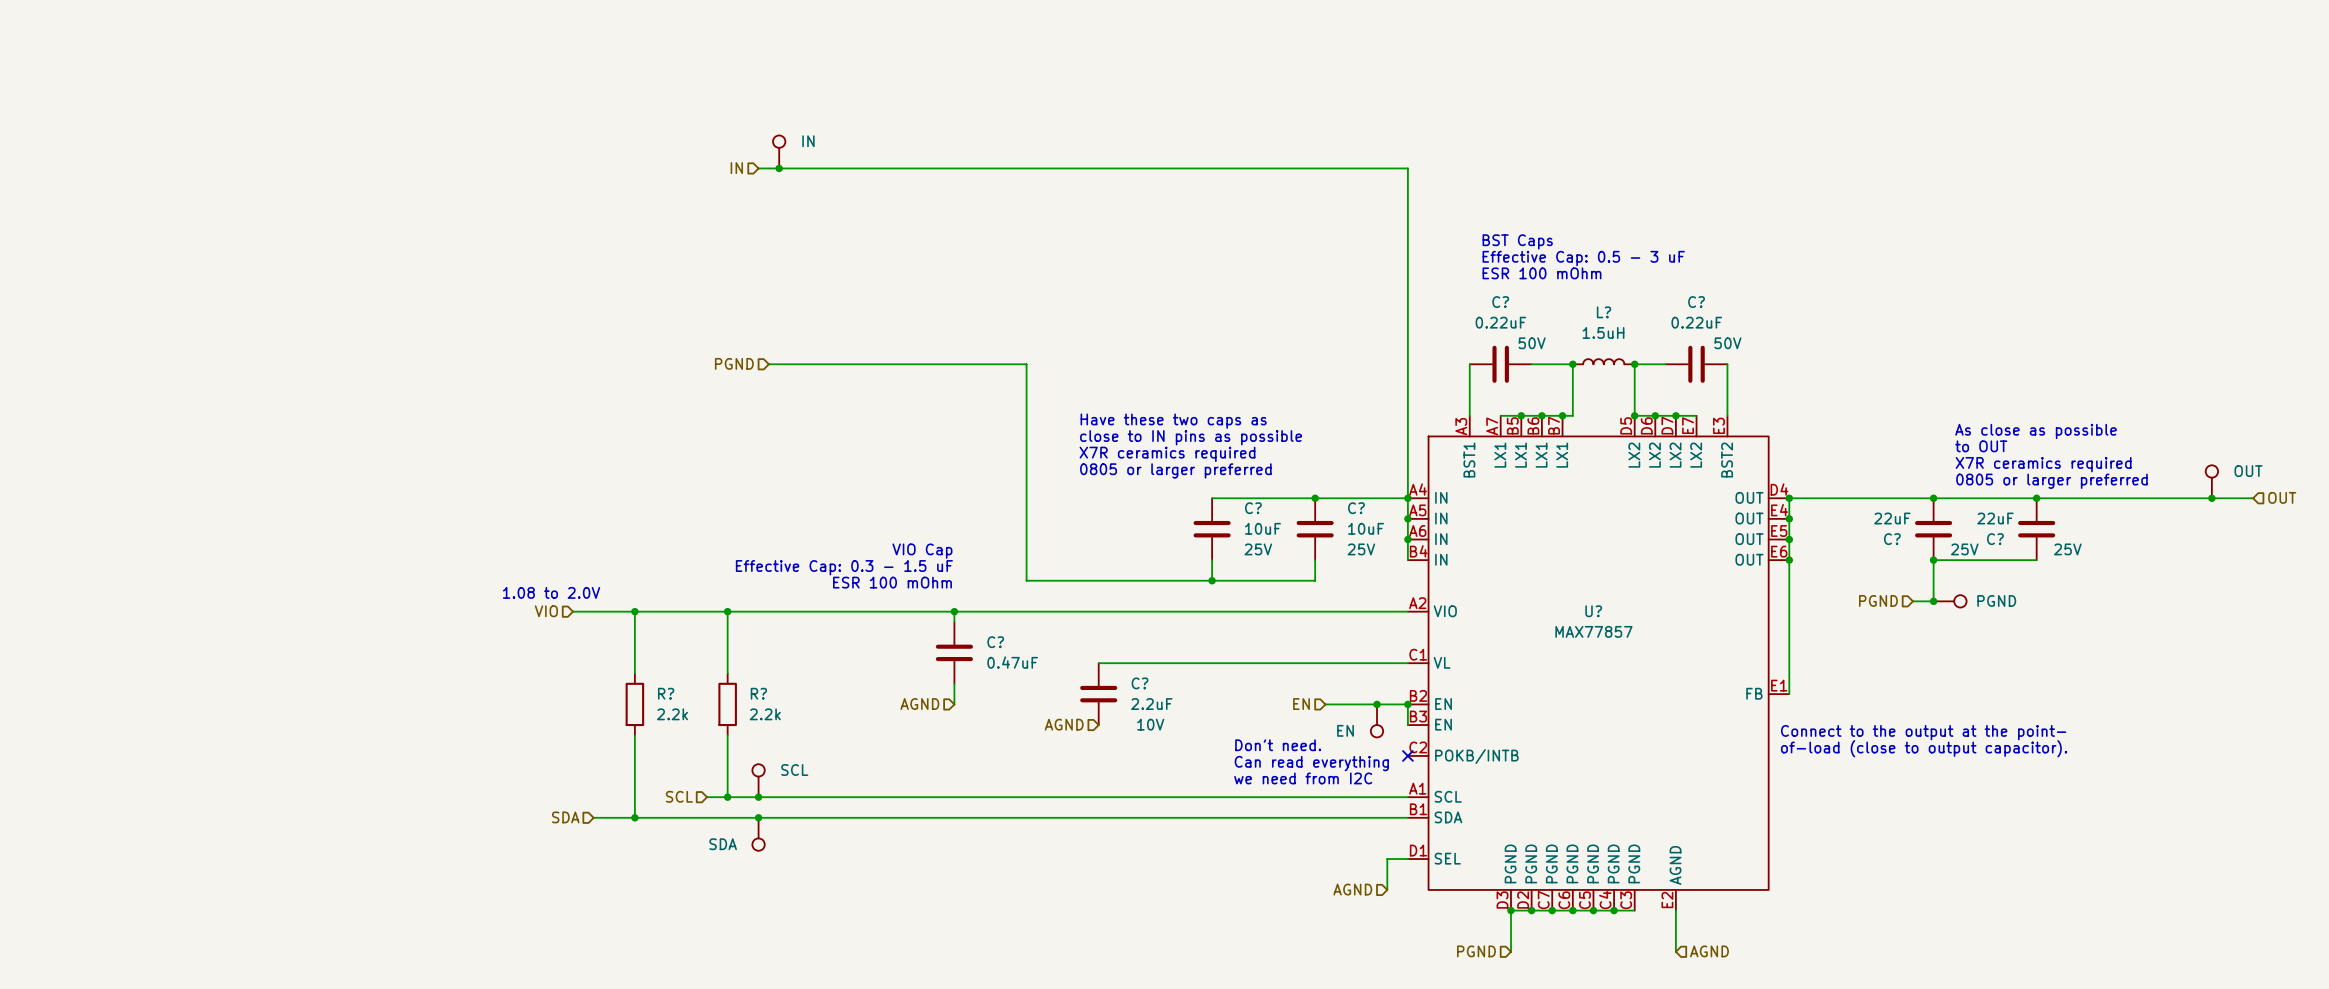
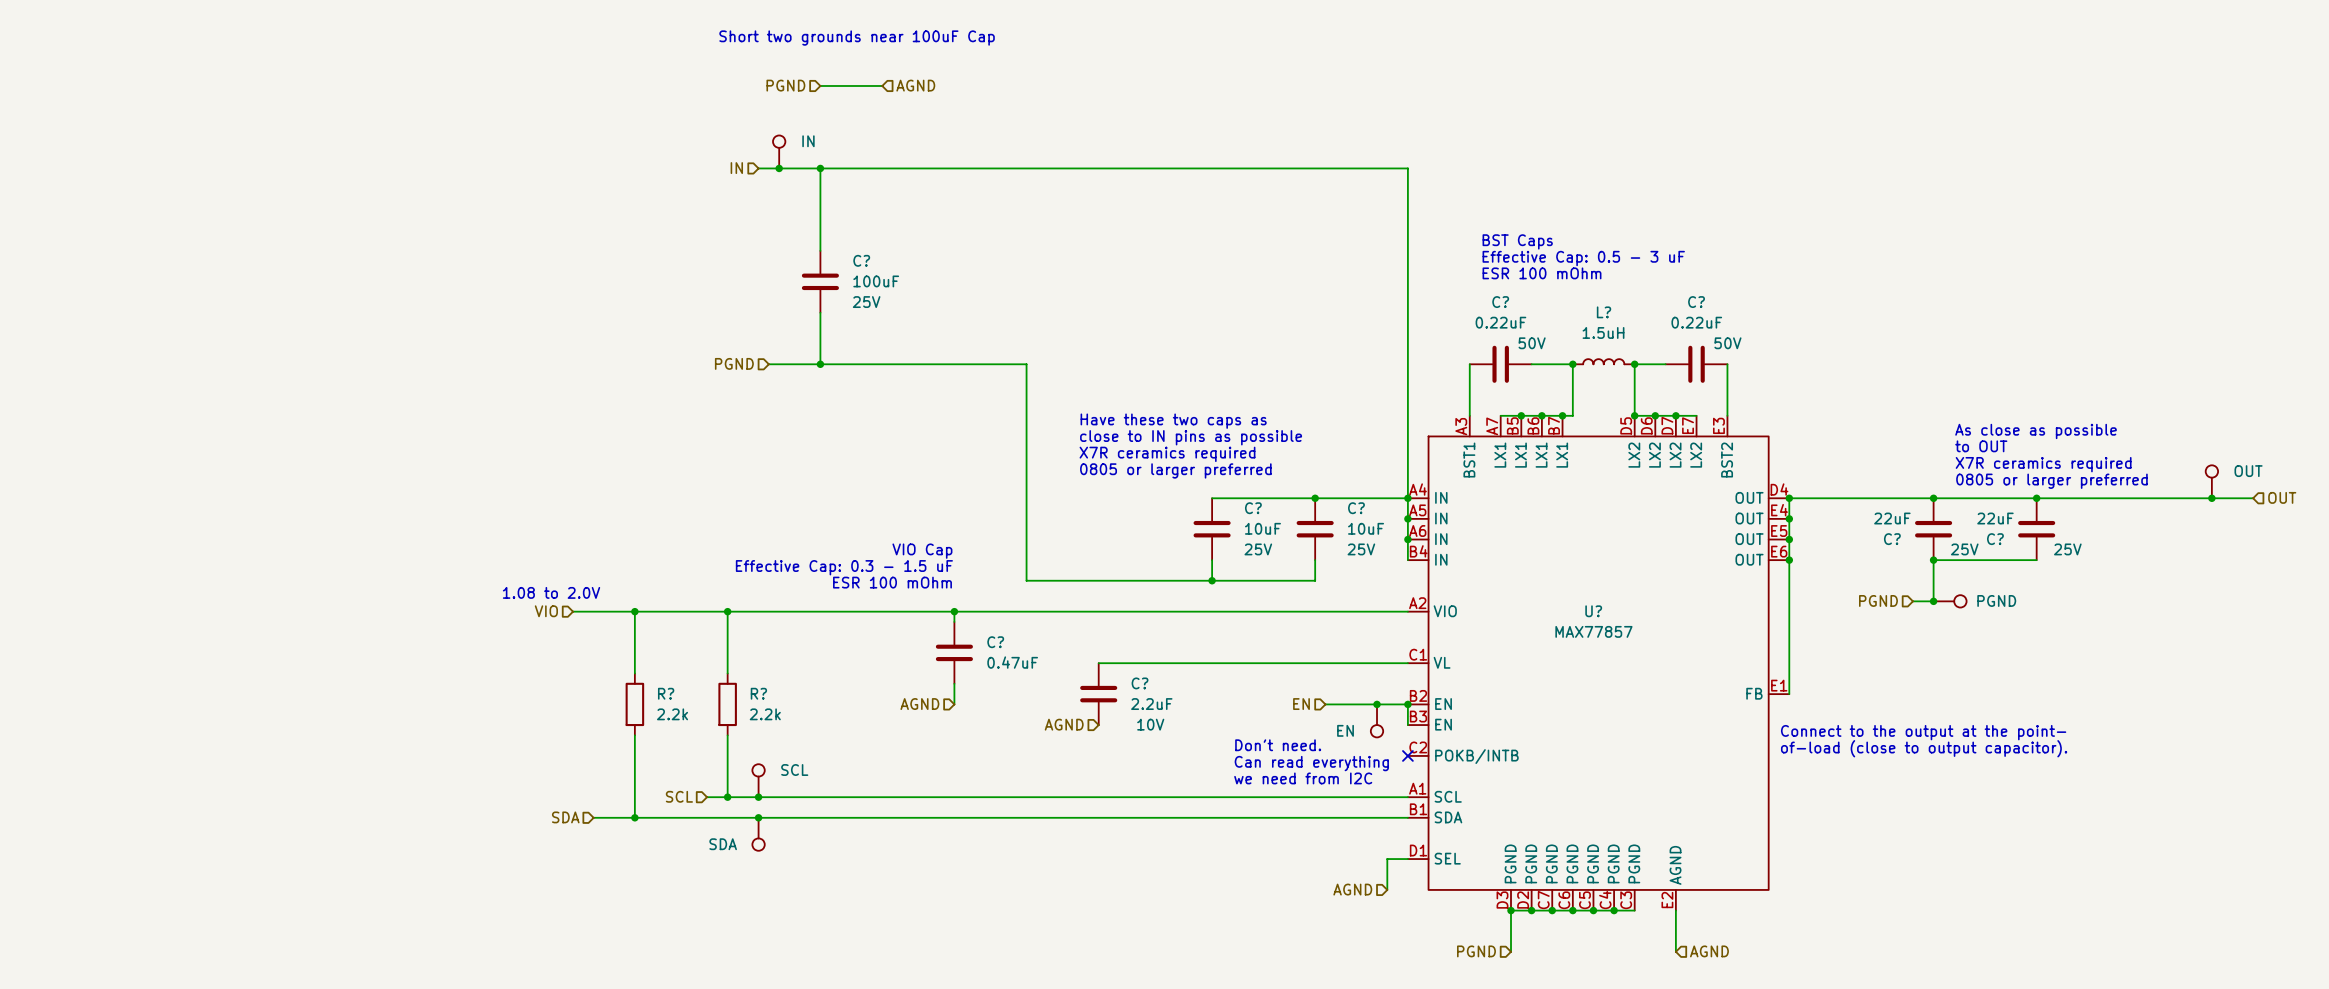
text: none -> Short two grounds near 100uF Cap (857, 38)
hierarchical label: none -> PGND (785, 85)
wire: none -> (820, 85) (882, 85)
hierarchical label: none -> AGND (915, 85)
wire: none -> (820, 168) (820, 250)
junction: none -> (820, 168)
C?: none -> 100uF (820, 281)
wire: none -> (820, 312) (820, 364)
junction: none -> (820, 364)

